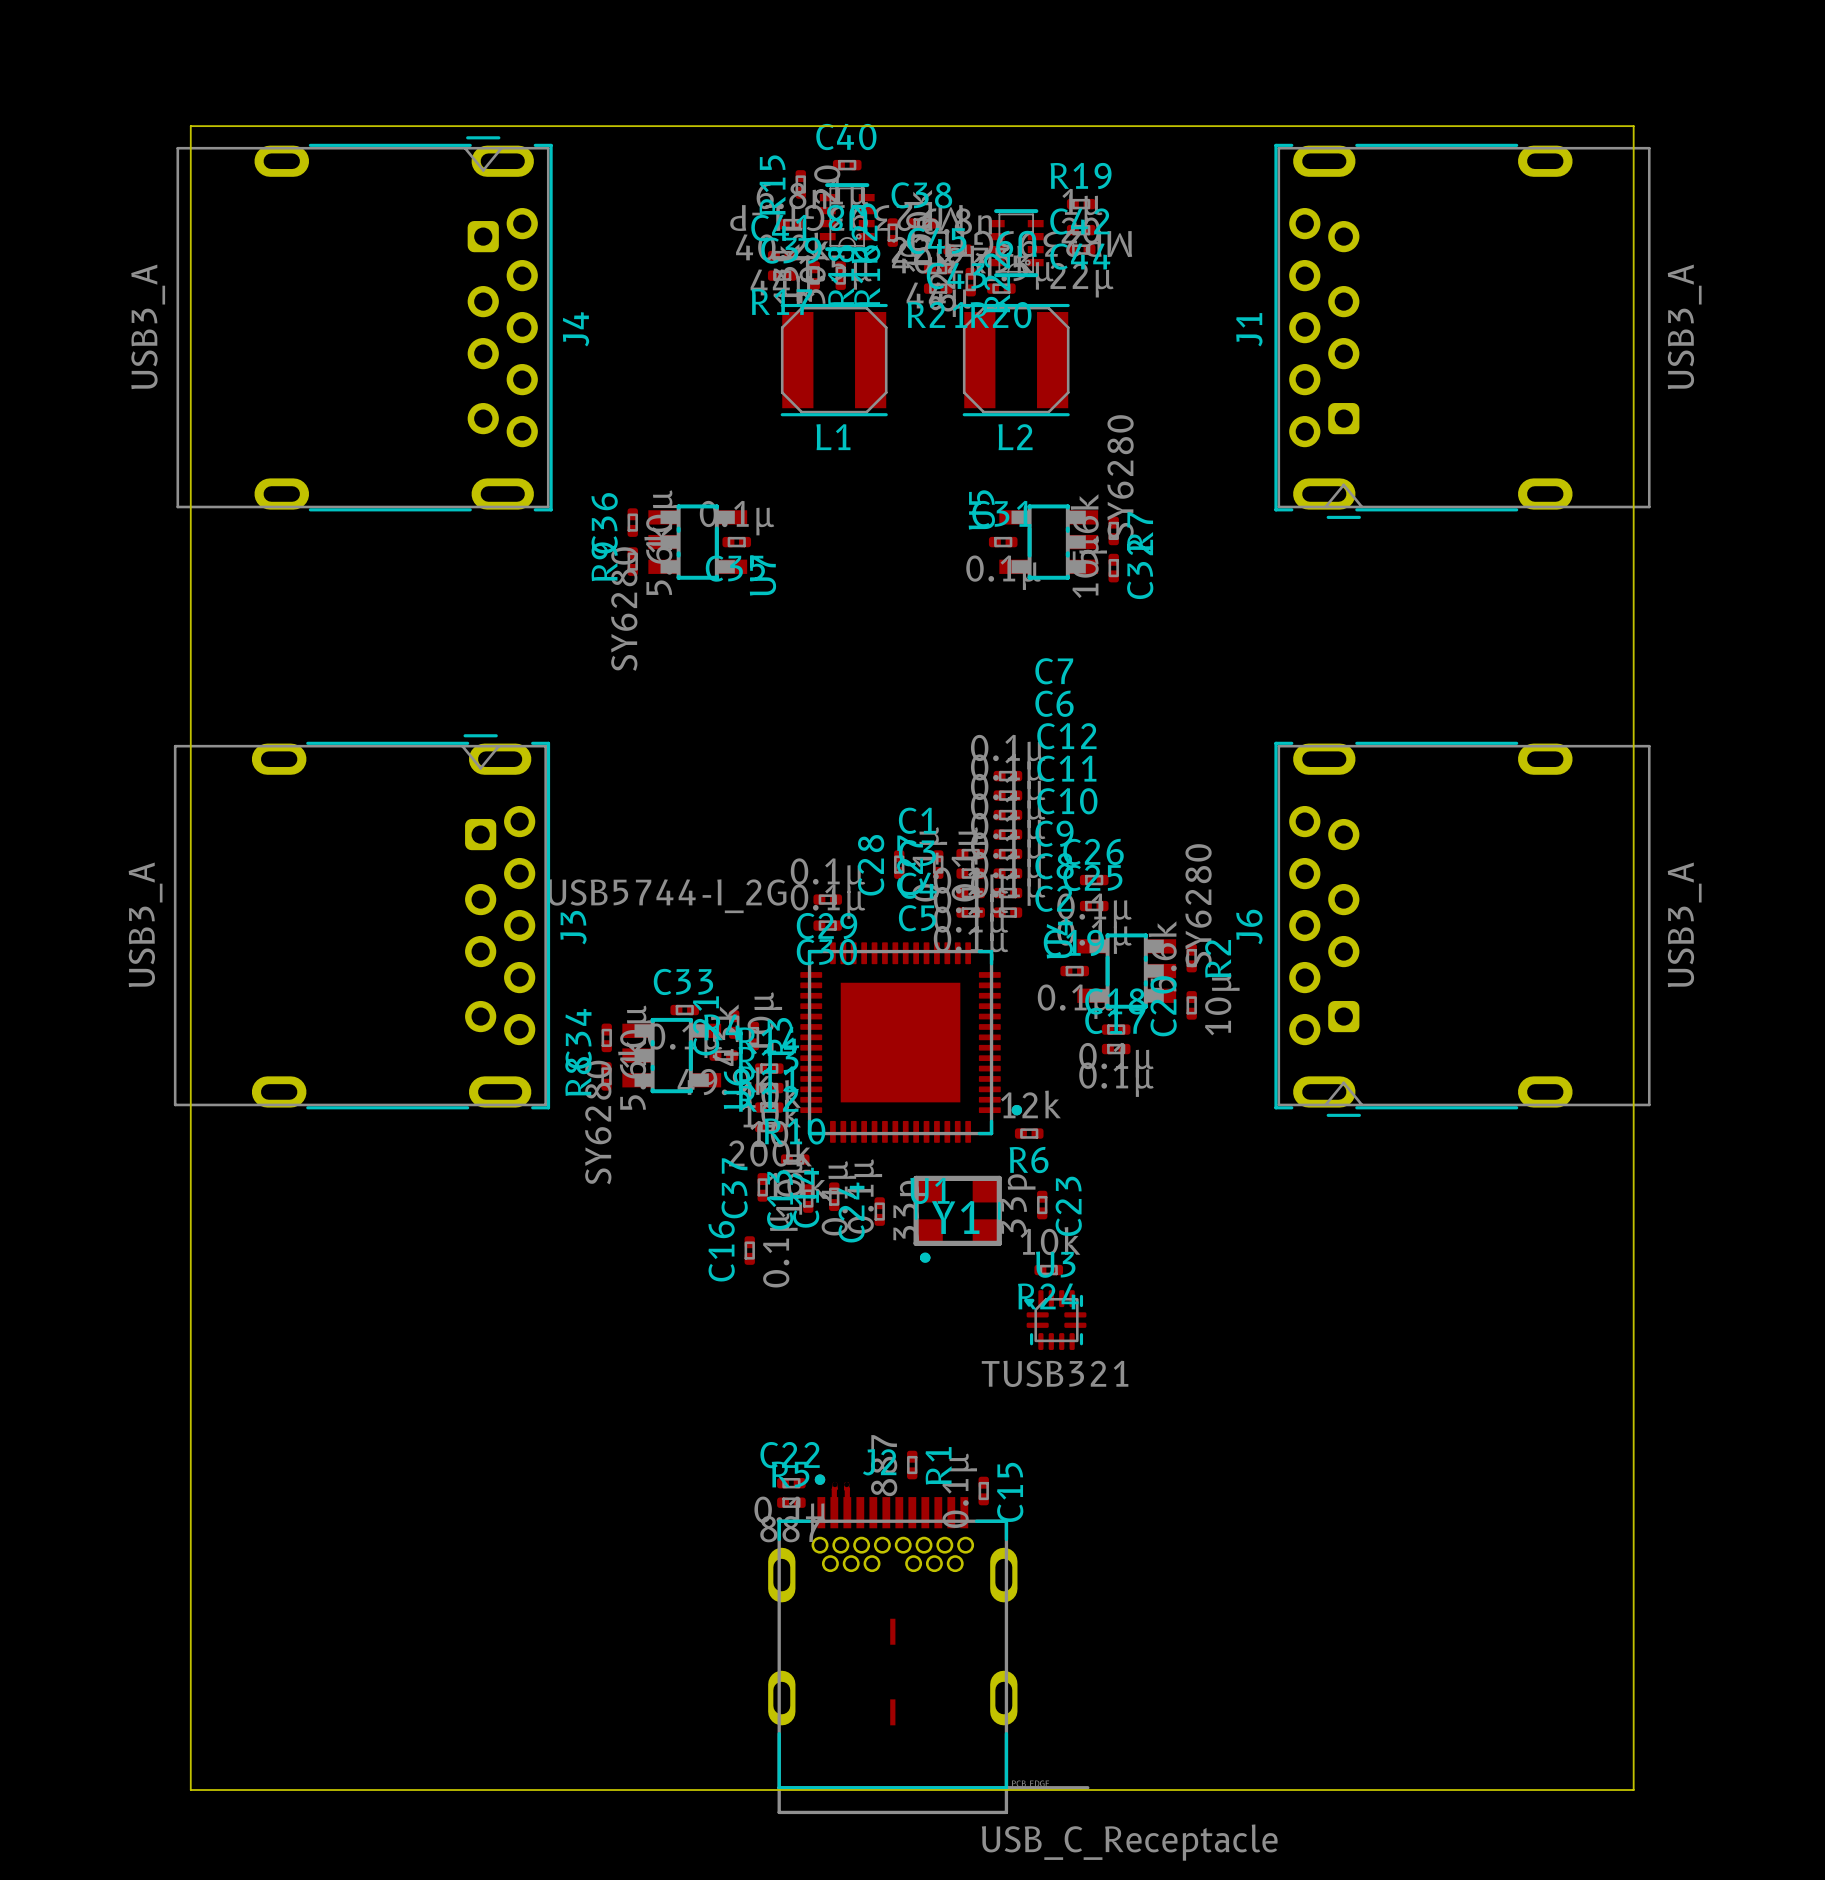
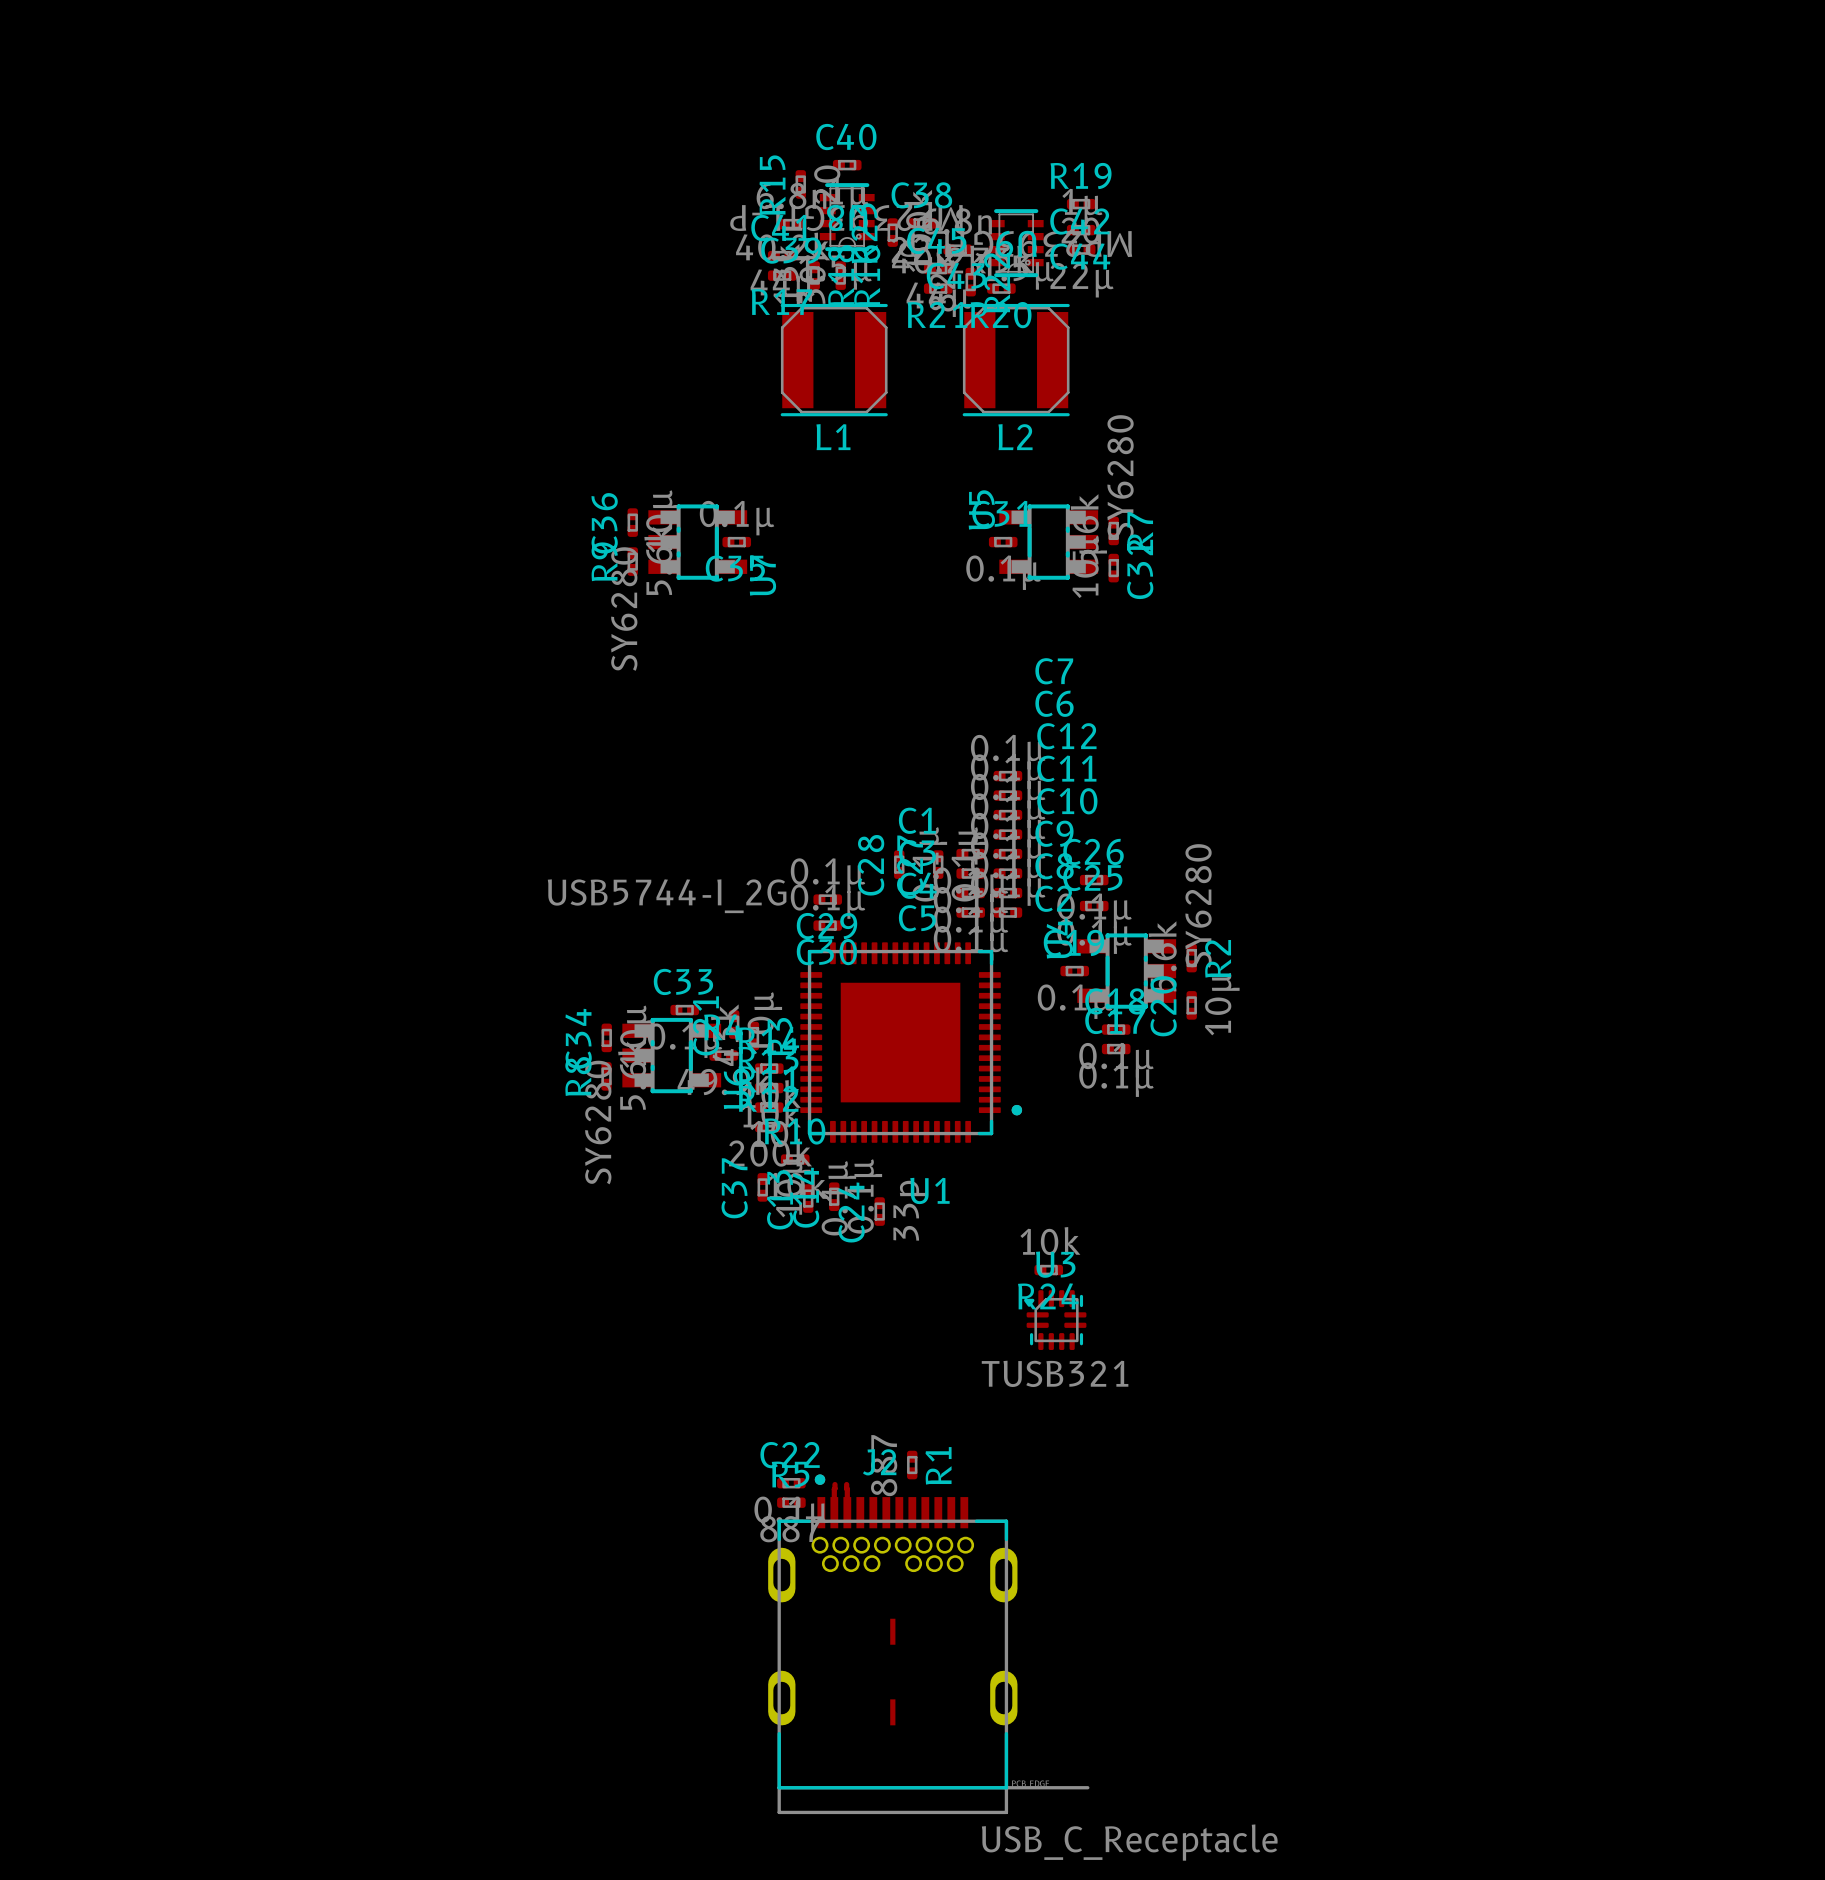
board edge: (190, 126) (1633, 126) (1633, 1790) (190, 1790) (190, 126) -> none
J4: USB3_A (364, 323) -> none
J1: USB3_A (1462, 331) -> none
J3: USB3_A (361, 921) -> none
J6: USB3_A (1462, 929) -> none
R6: 12k (1029, 1133) -> none
C23: 33p (1042, 1205) -> none
Y1: (957, 1219) -> none
C16: 0.1µ (749, 1250) -> none
via: (834, 1484) -> none
via: (846, 1484) -> none
C15: 0.1µ (983, 1491) -> none

